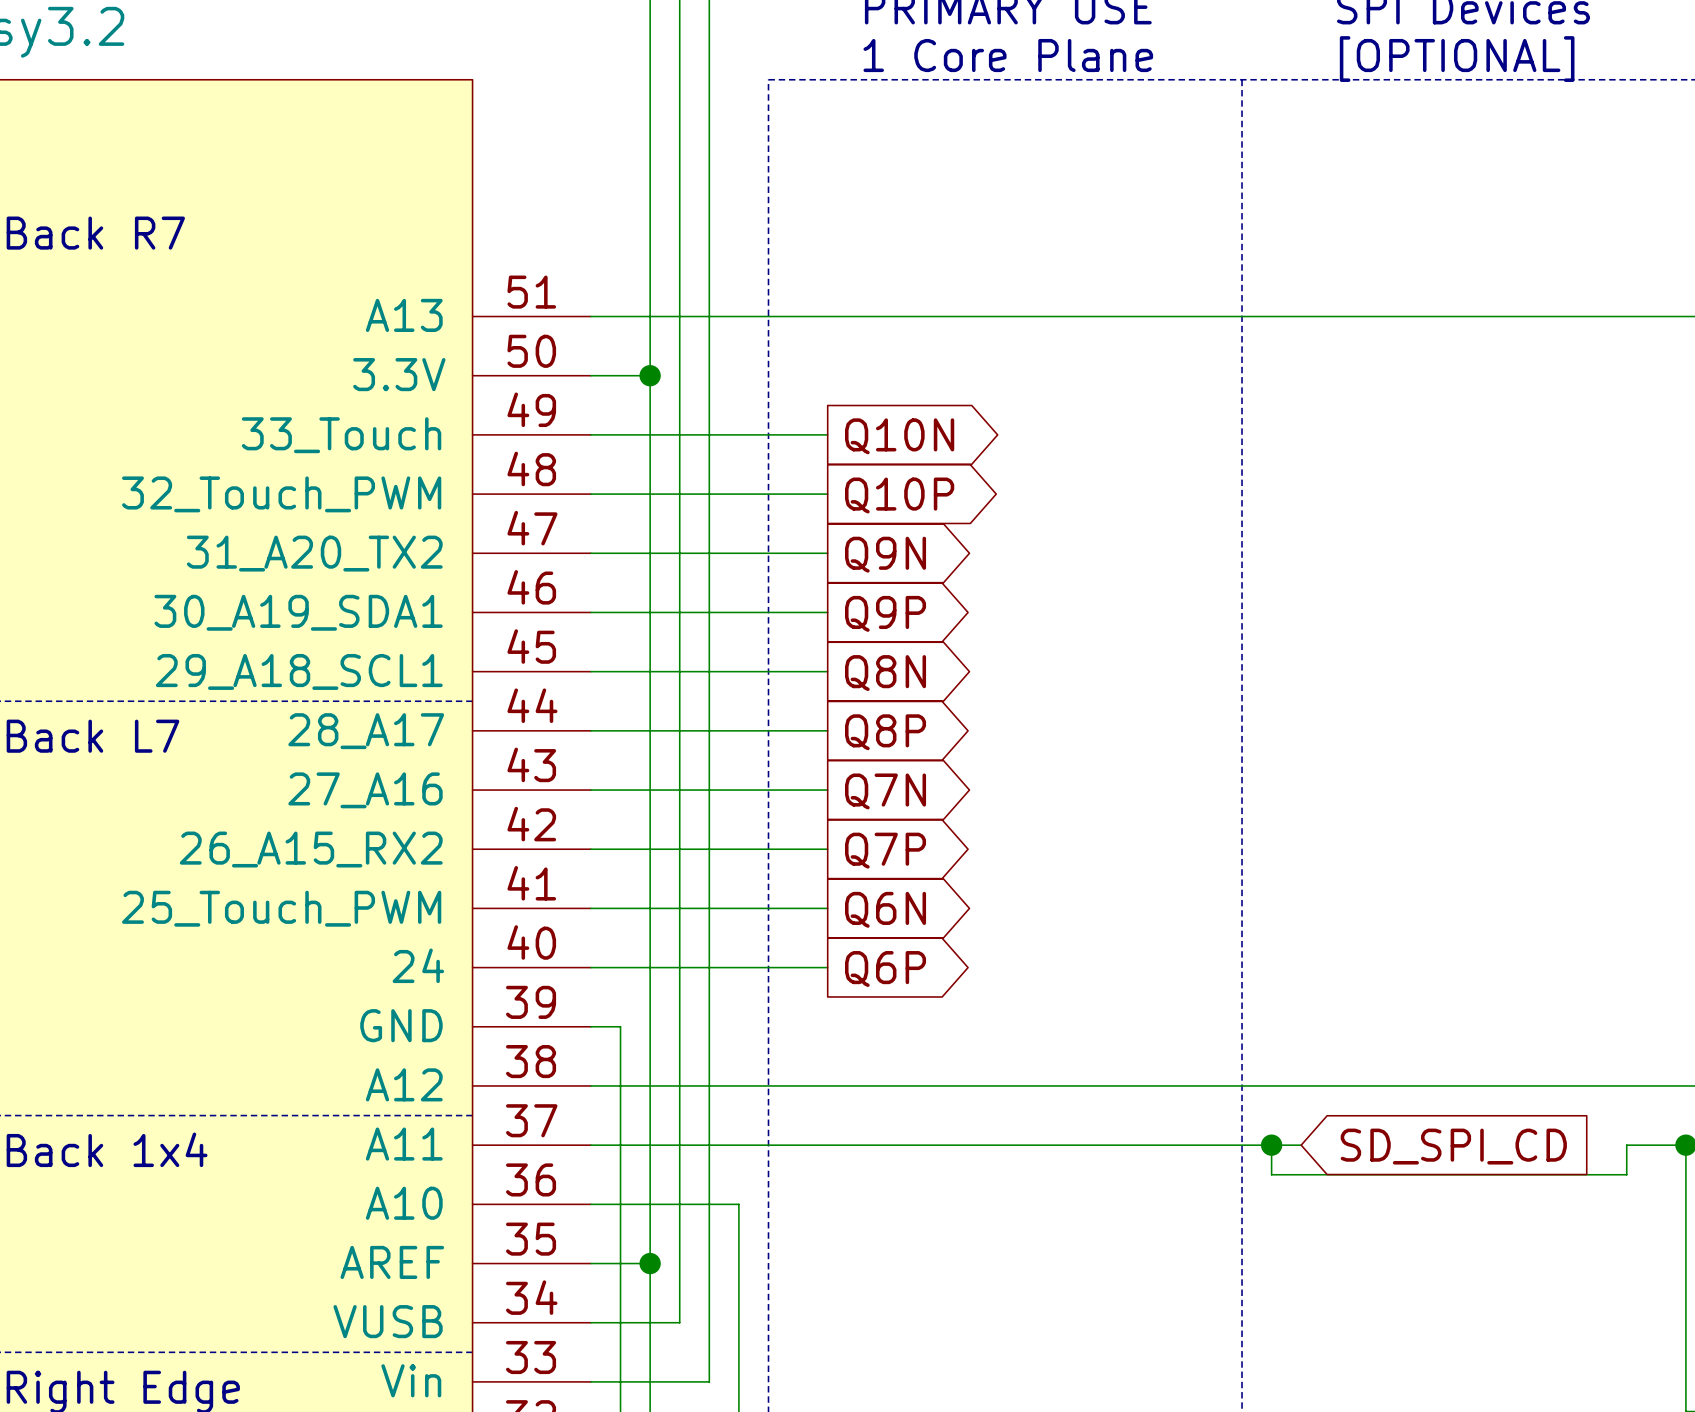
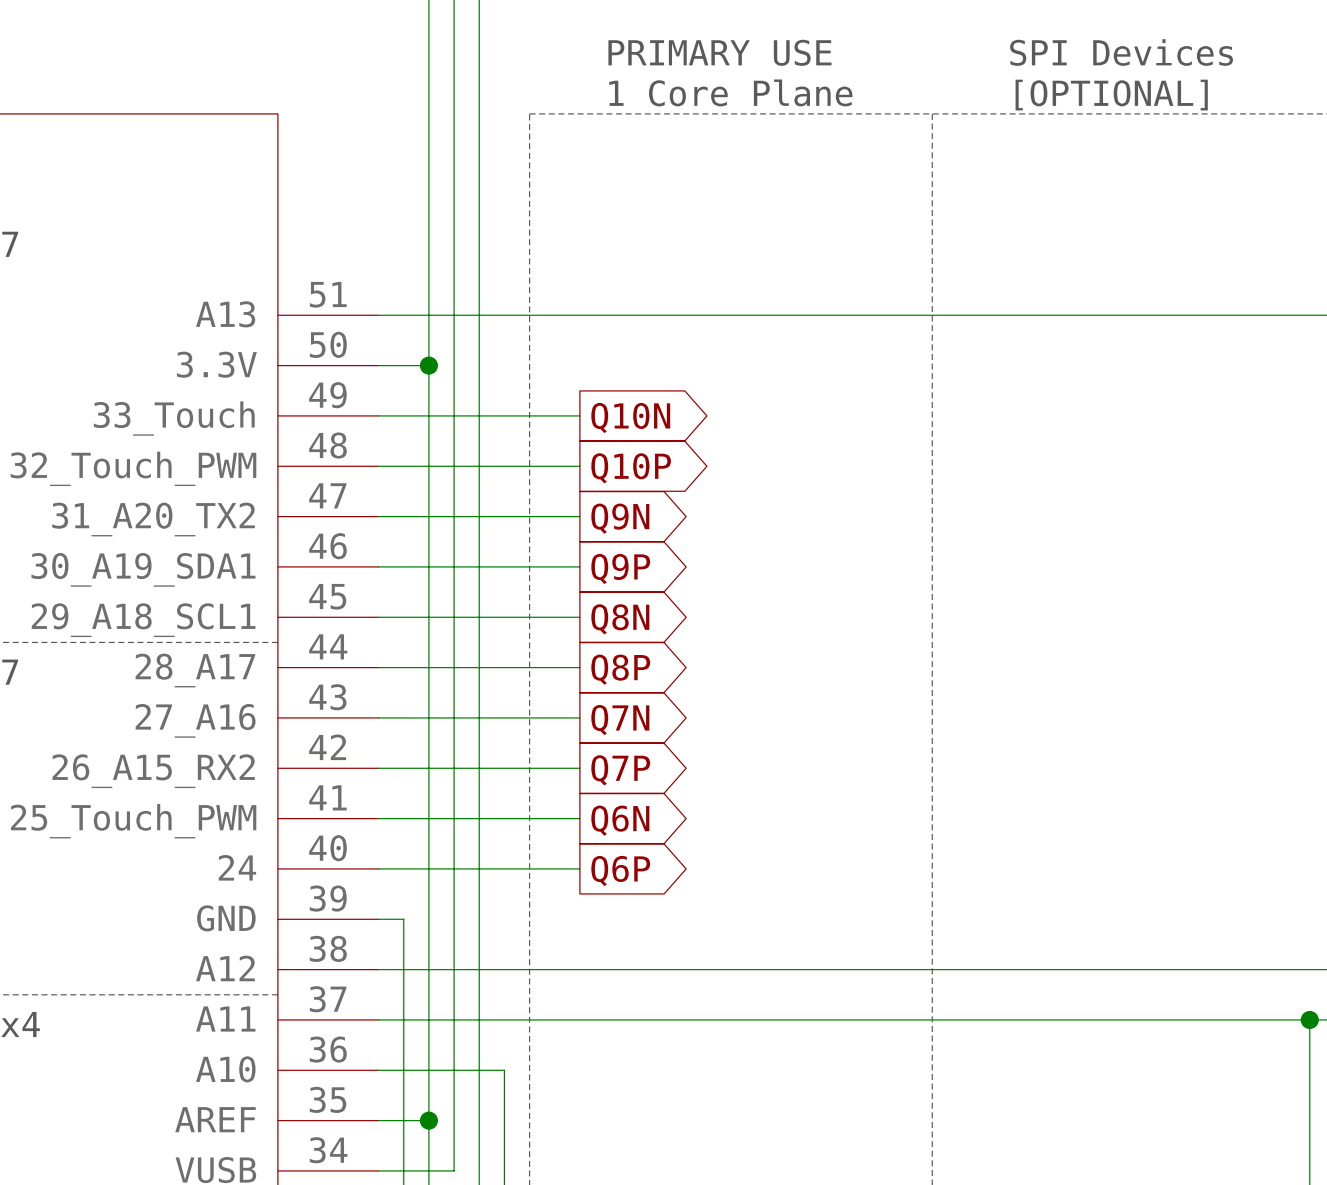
wire: (1271, 1145) (1271, 1174) (1626, 1174) (1626, 1145) -> (982, 1019) (1259, 1019)
junction: (1271, 1145) -> none
global label: SD_SPI_CD (1453, 1146) -> none

